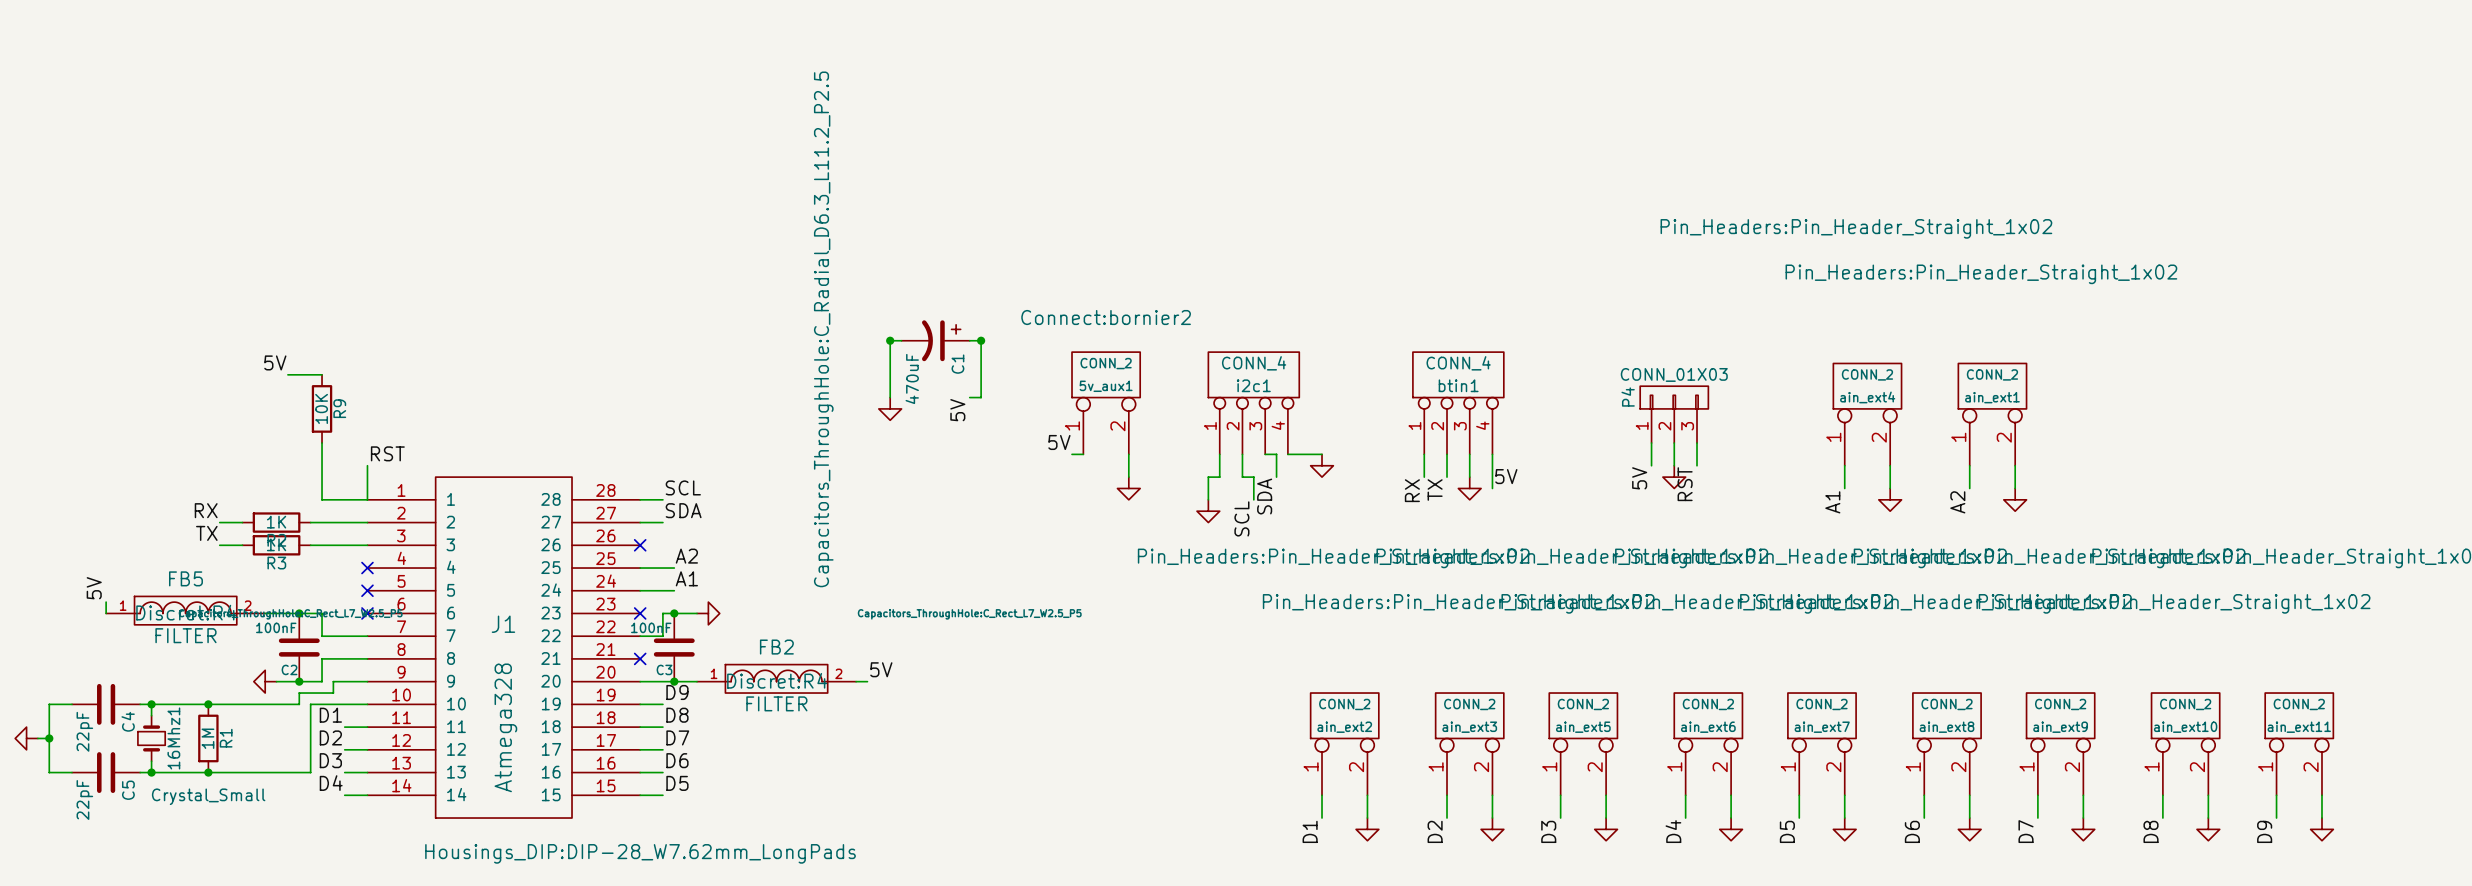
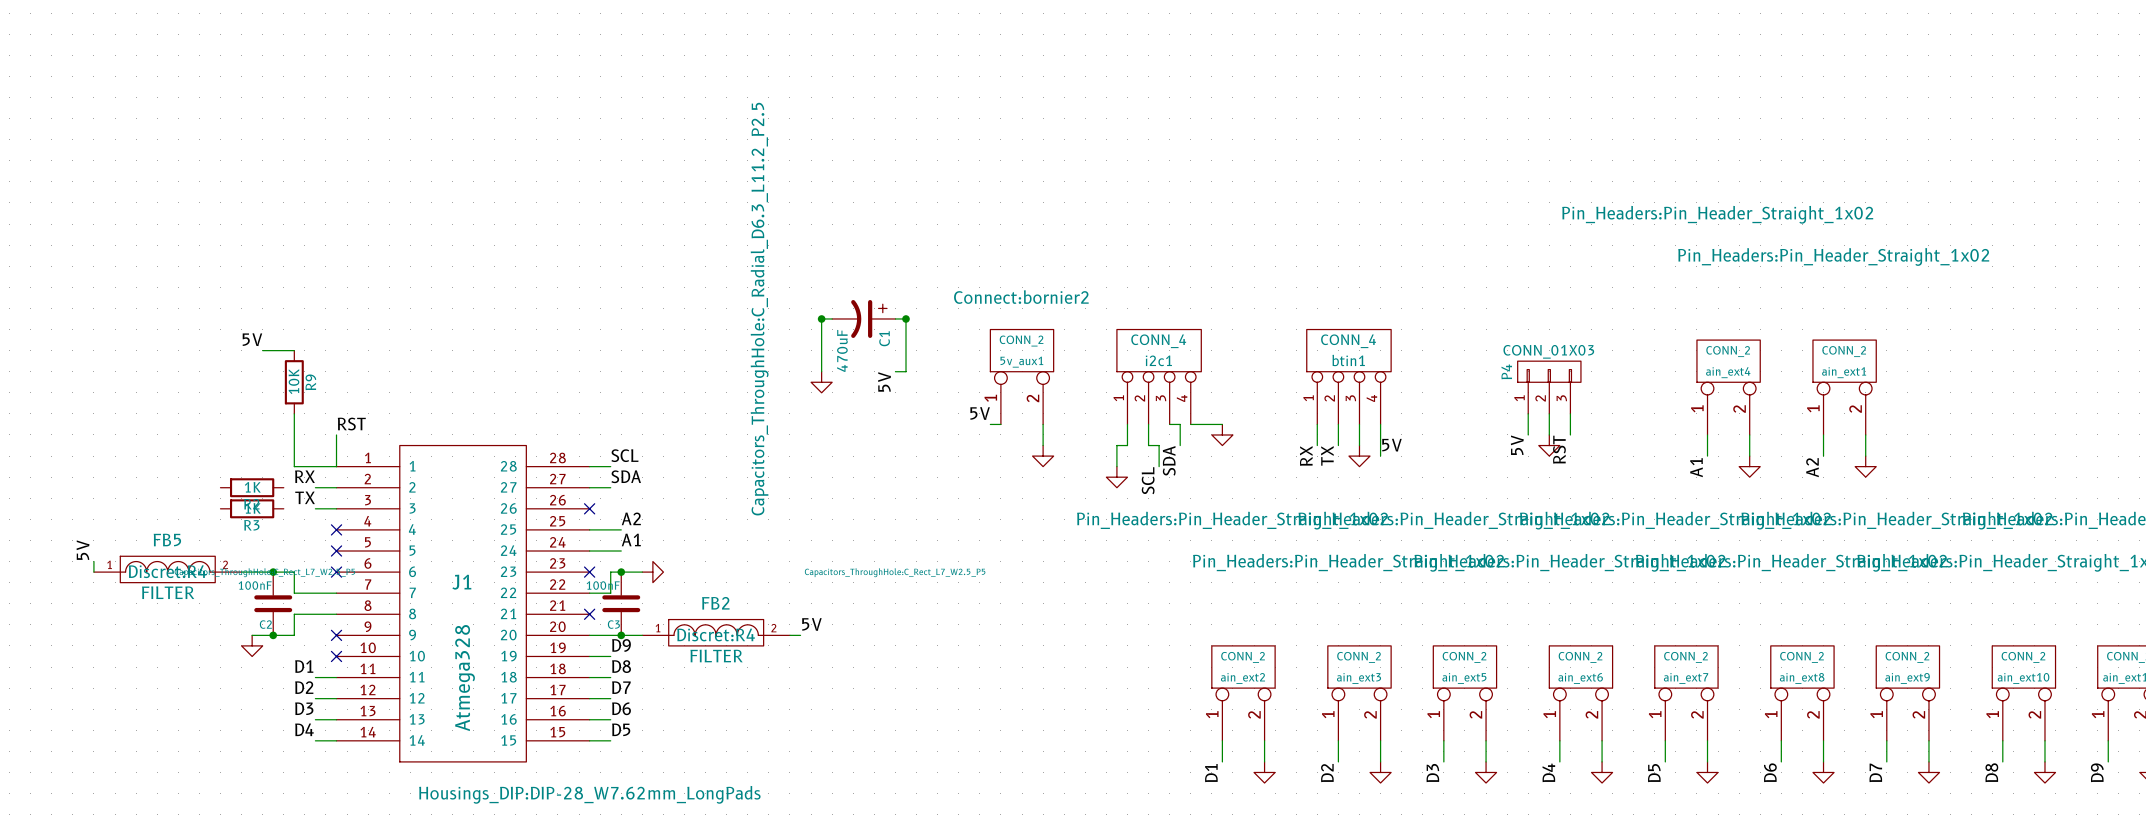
label position: RX (206, 510) -> RX (304, 476)
wire: (219, 522) (242, 522) -> none
wire: (310, 522) (344, 522) -> none
label position: TX (206, 533) -> TX (305, 497)
wire: (219, 545) (242, 545) -> none
wire: (310, 545) (344, 545) -> none
power symbol rotation: 0° (265, 681) -> 90° counterclockwise (252, 645)
power symbol position: (265, 681) -> (252, 645)
wire: (367, 681) (333, 681) (333, 693) (299, 693) (299, 704) (140, 704) -> none
no-connect mark: none -> (336, 635)
wire: (72, 704) (49, 704) (49, 772) (72, 772) -> none
C4: 22pF (106, 704) -> none
wire: (151, 704) (151, 715) -> none
junction: (151, 704) -> none
junction: (208, 704) -> none
wire: (367, 704) (310, 704) (310, 772) (140, 772) -> none
no-connect mark: none -> (336, 656)
power symbol: (26, 738) -> none
wire: (37, 738) (49, 738) -> none
junction: (49, 738) -> none
16Mhz1: Crystal_Small (151, 738) -> none
R1: 1M (208, 738) -> none
wire: (151, 761) (151, 772) -> none
C5: 22pF (106, 772) -> none
junction: (151, 772) -> none
junction: (208, 772) -> none

